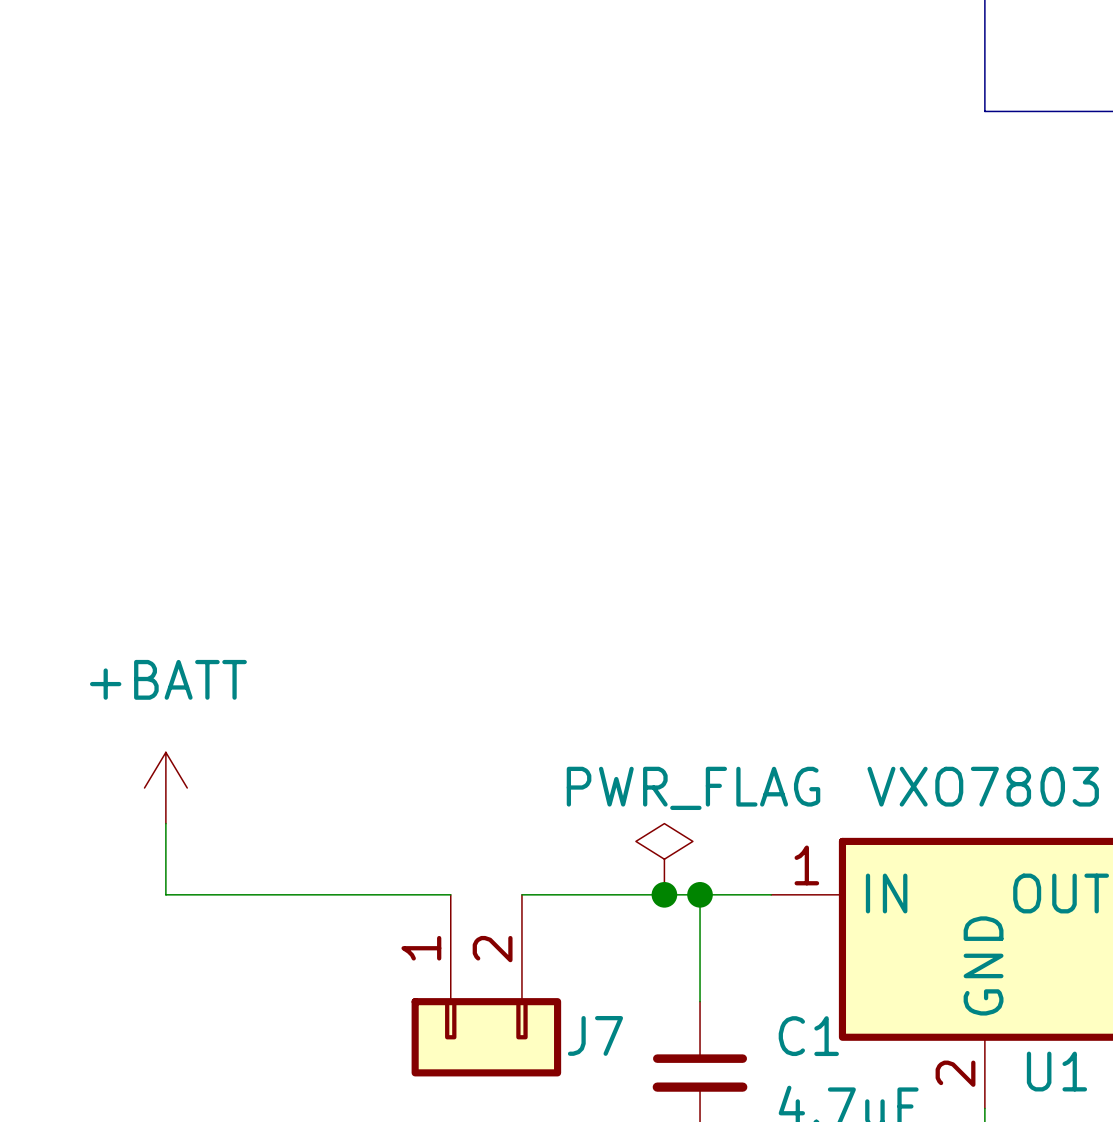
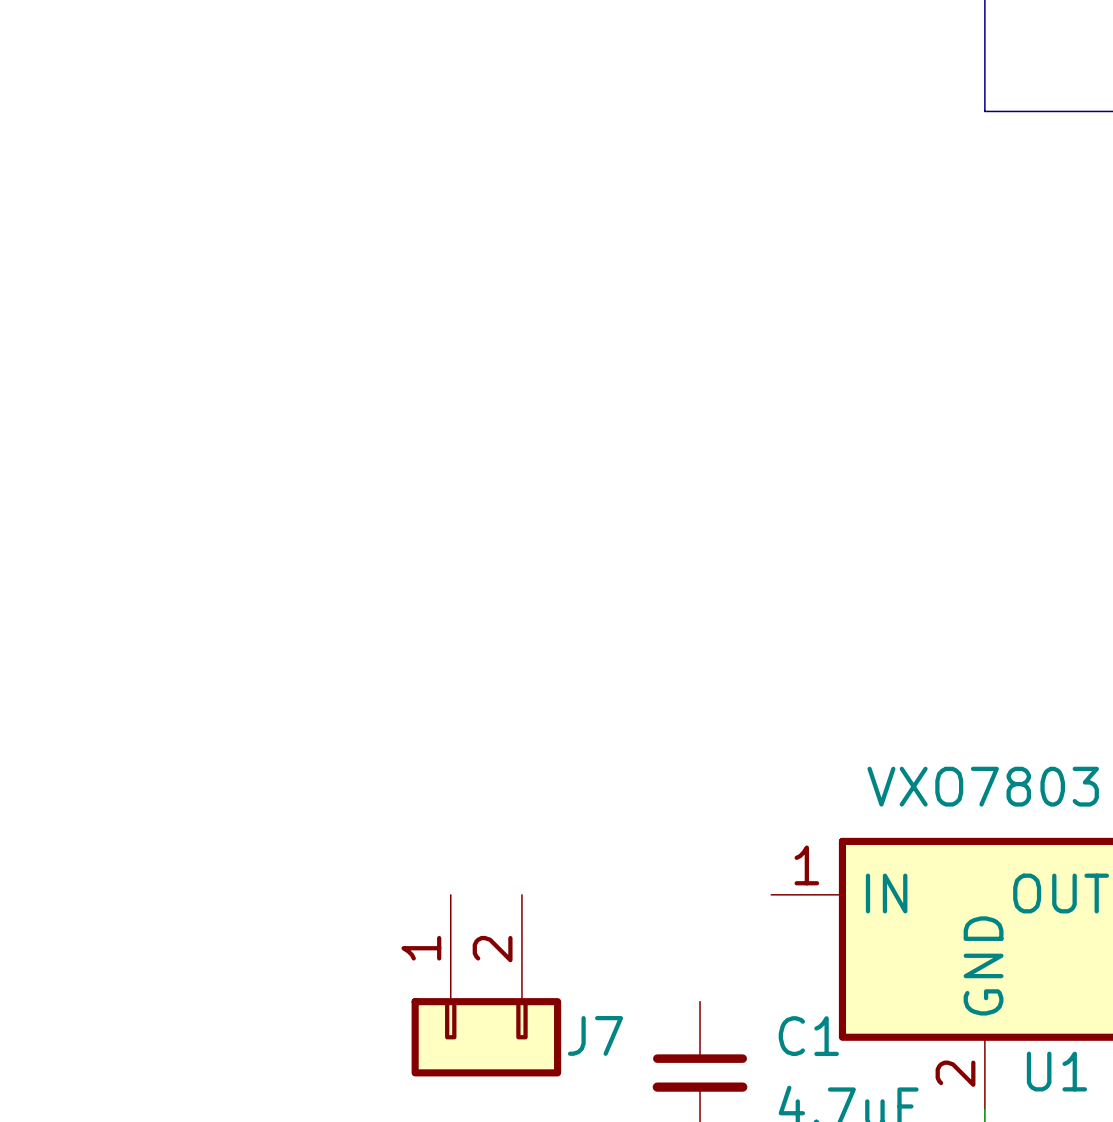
power symbol: +BATT (165, 788) -> none
wire: (165, 823) (165, 894) (450, 894) -> none
power symbol: PWR_FLAG (664, 859) -> none
wire: (521, 894) (771, 894) -> none
junction: (664, 894) -> none
wire: (700, 894) (700, 1001) -> none
junction: (700, 894) -> none

